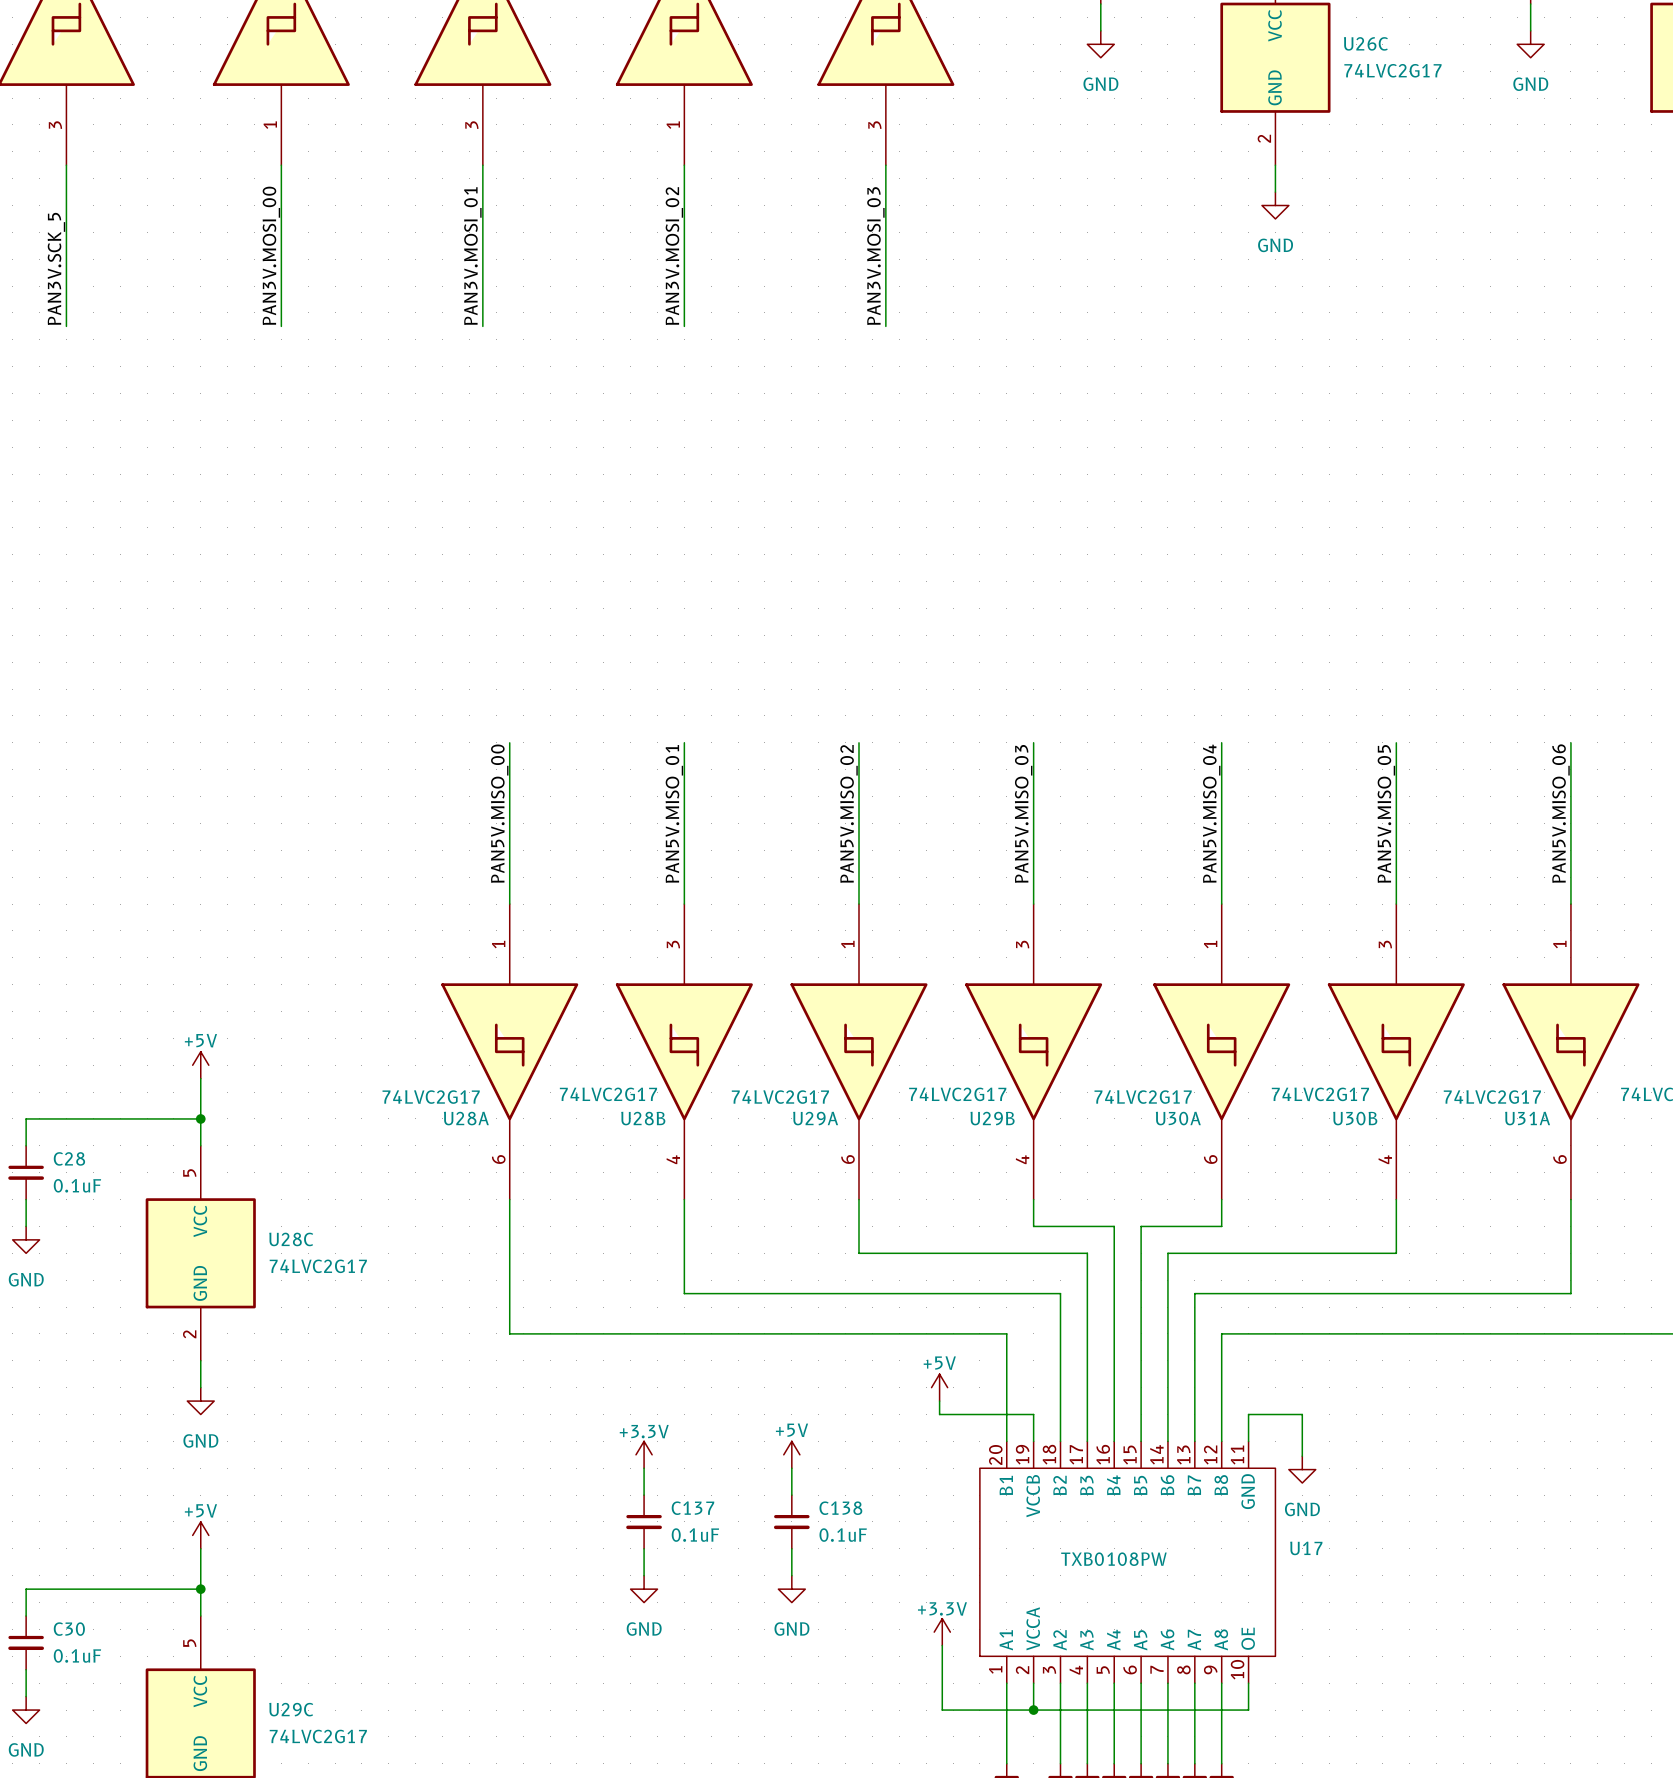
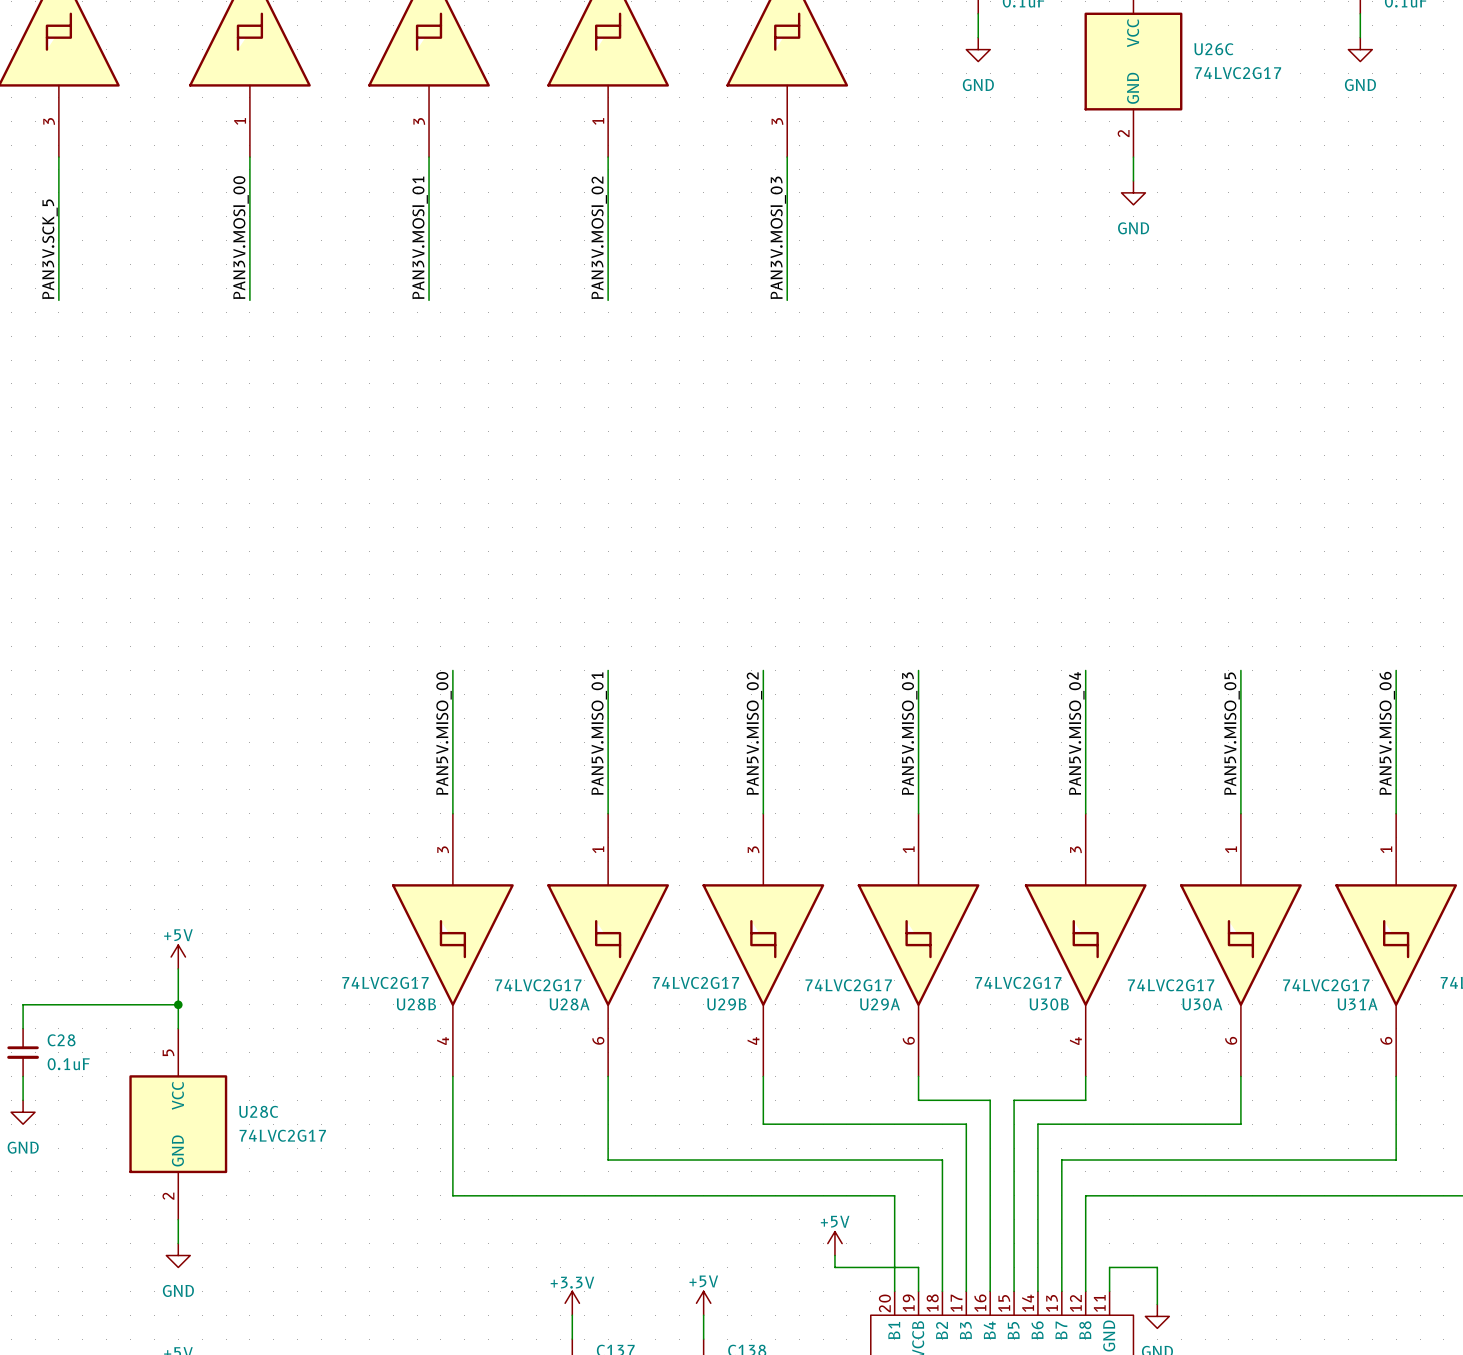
U28A position: (509, 1051) -> (608, 945)
U28B position: (684, 1051) -> (452, 945)
U29A position: (858, 1051) -> (918, 945)
U29B position: (1033, 1051) -> (763, 945)
U30A position: (1221, 1051) -> (1240, 945)
U30B position: (1396, 1051) -> (1085, 945)

